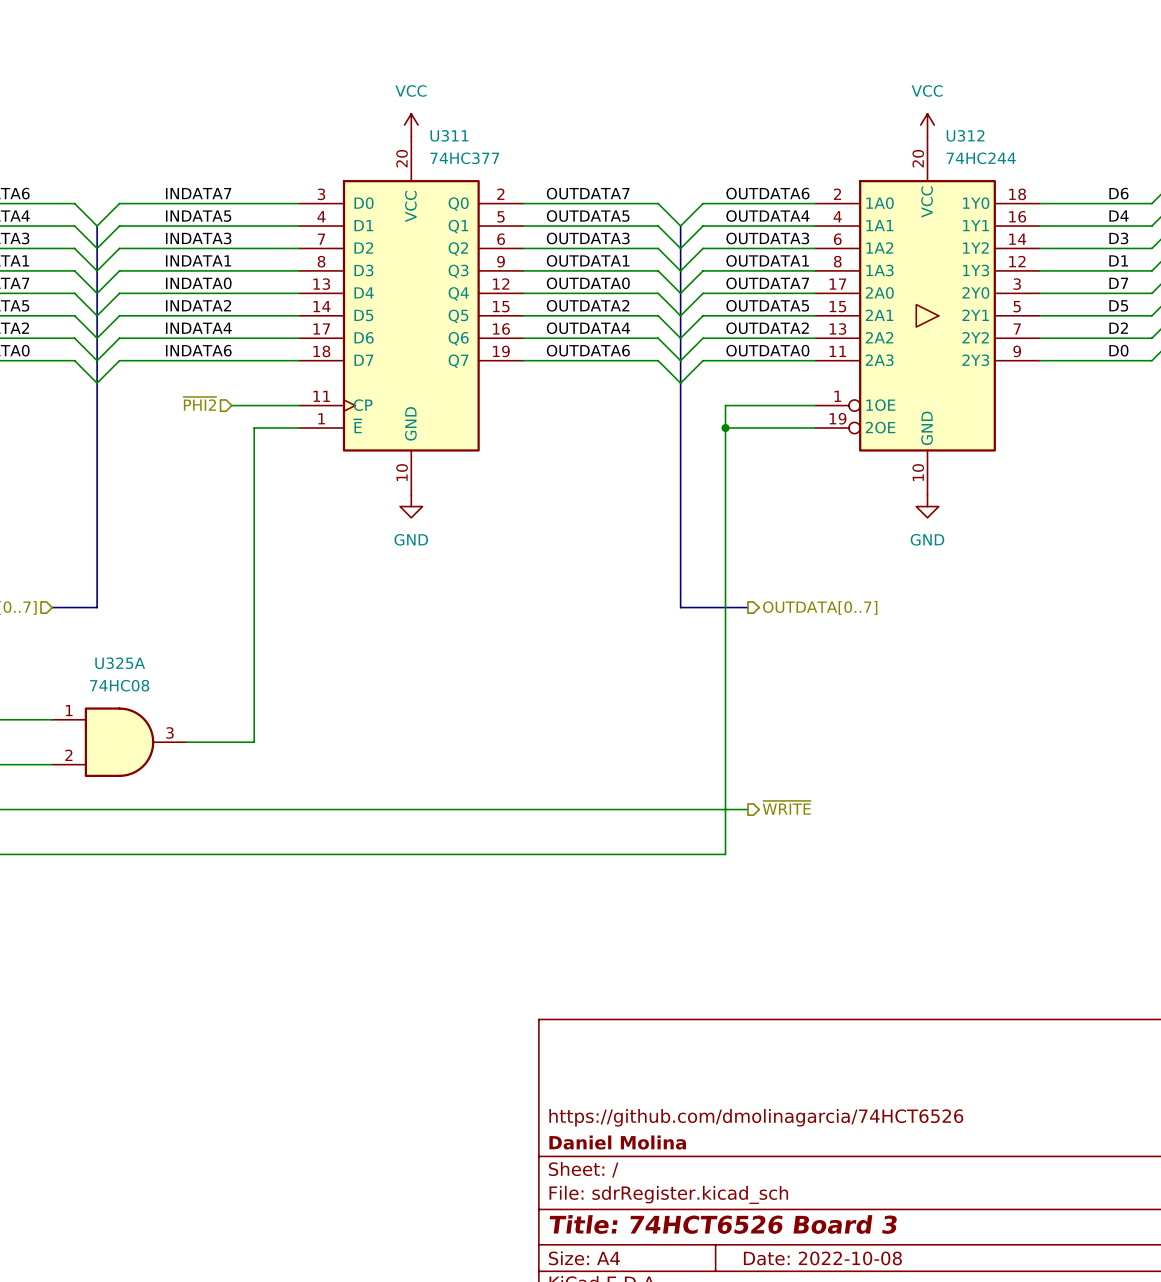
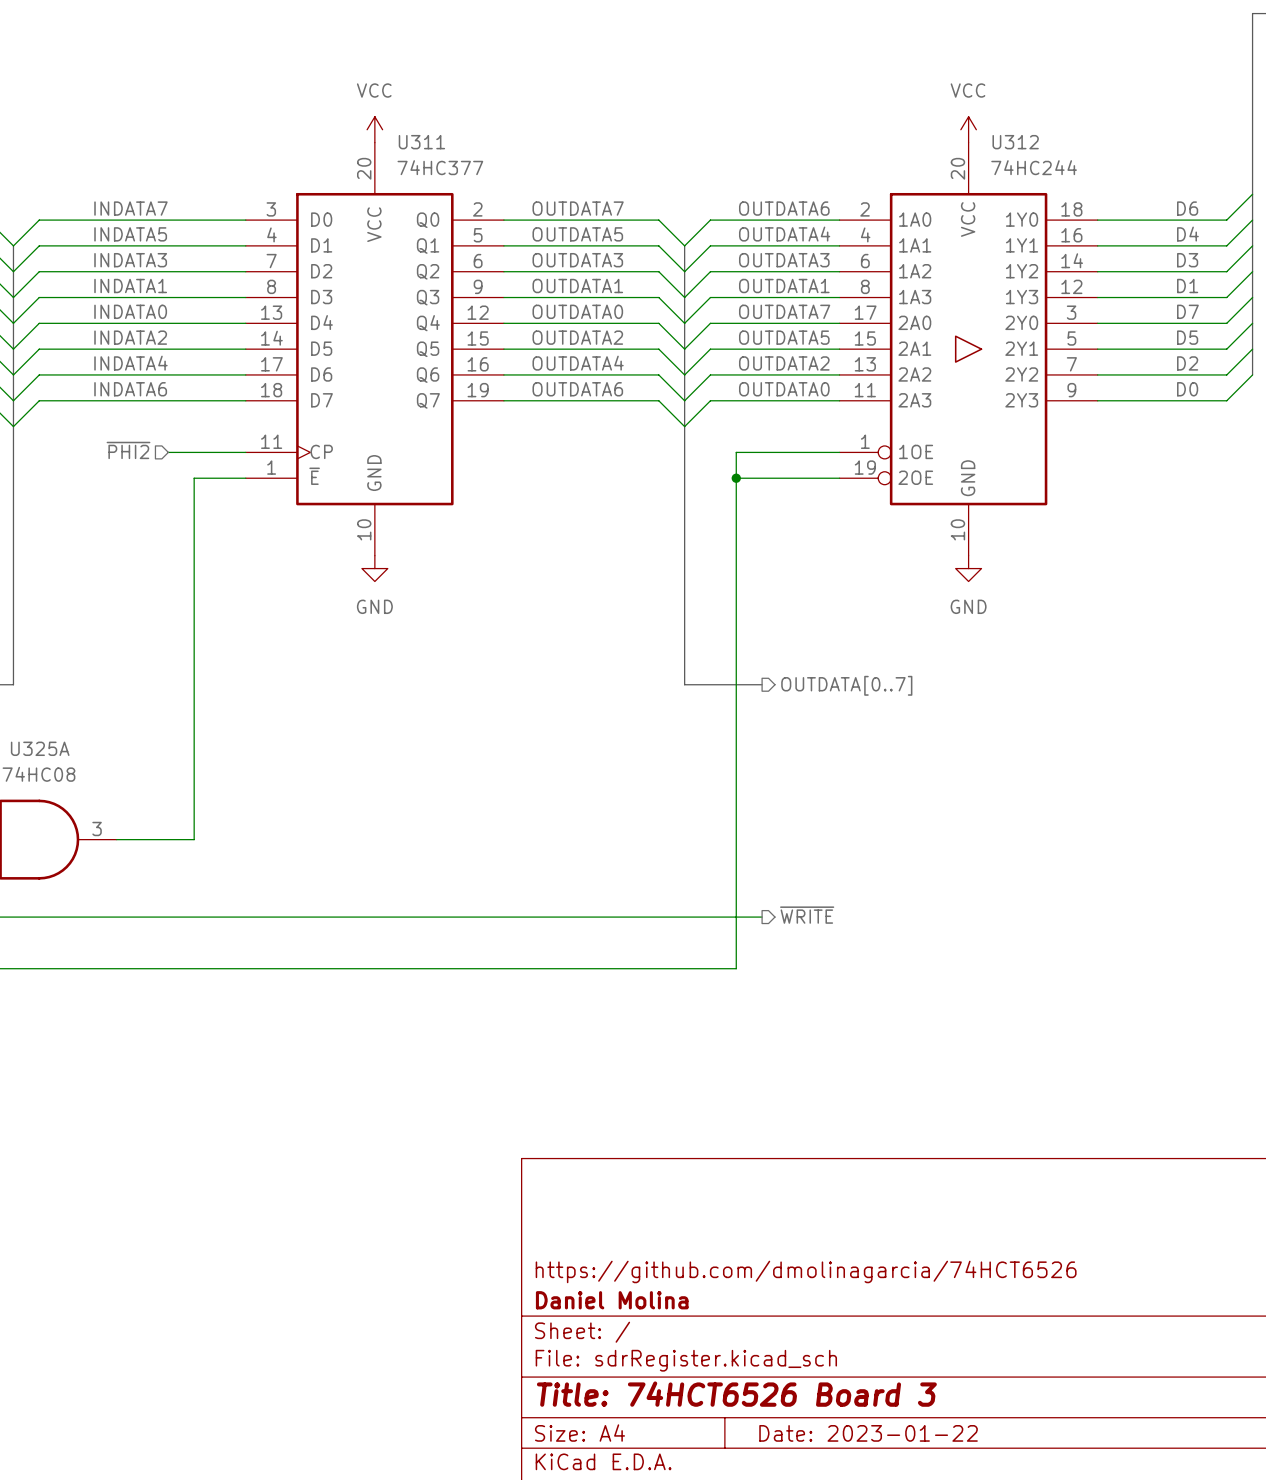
title block: Date: 2022-10-08 (822, 1258) -> Date: 2023-01-22 (868, 1433)

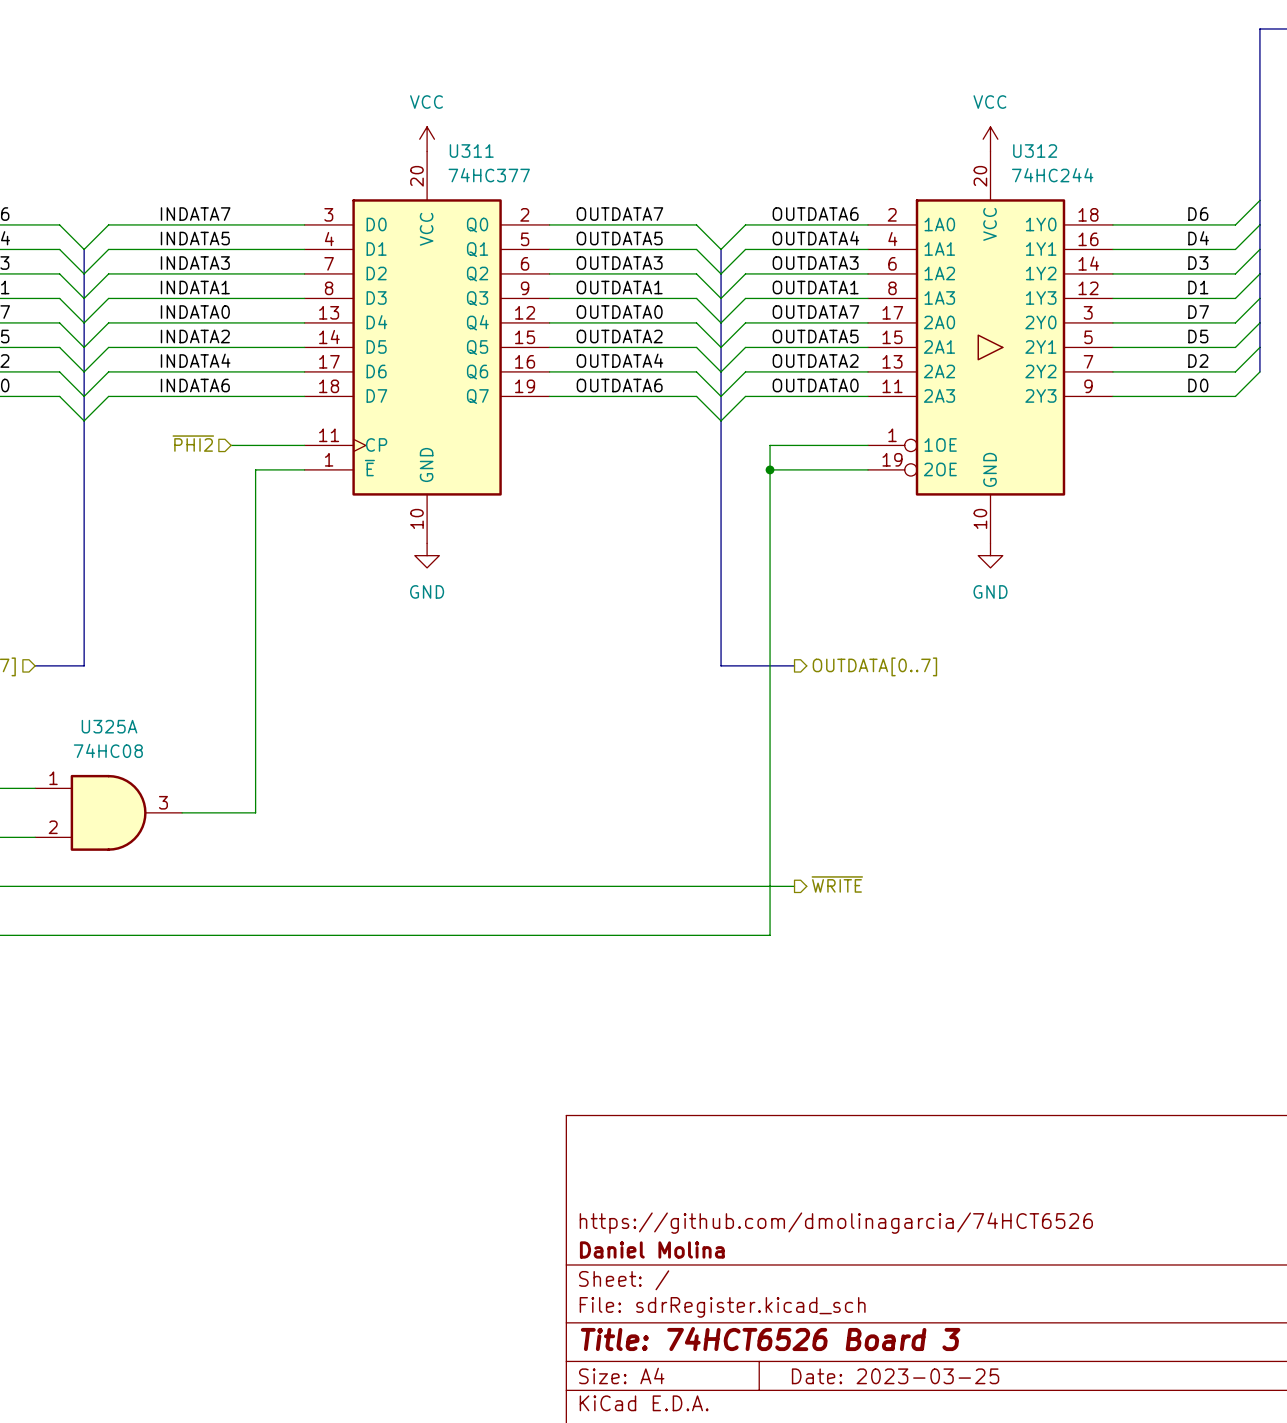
title block: Date: 2023-01-22 (868, 1433) -> Date: 2023-03-25 (895, 1376)

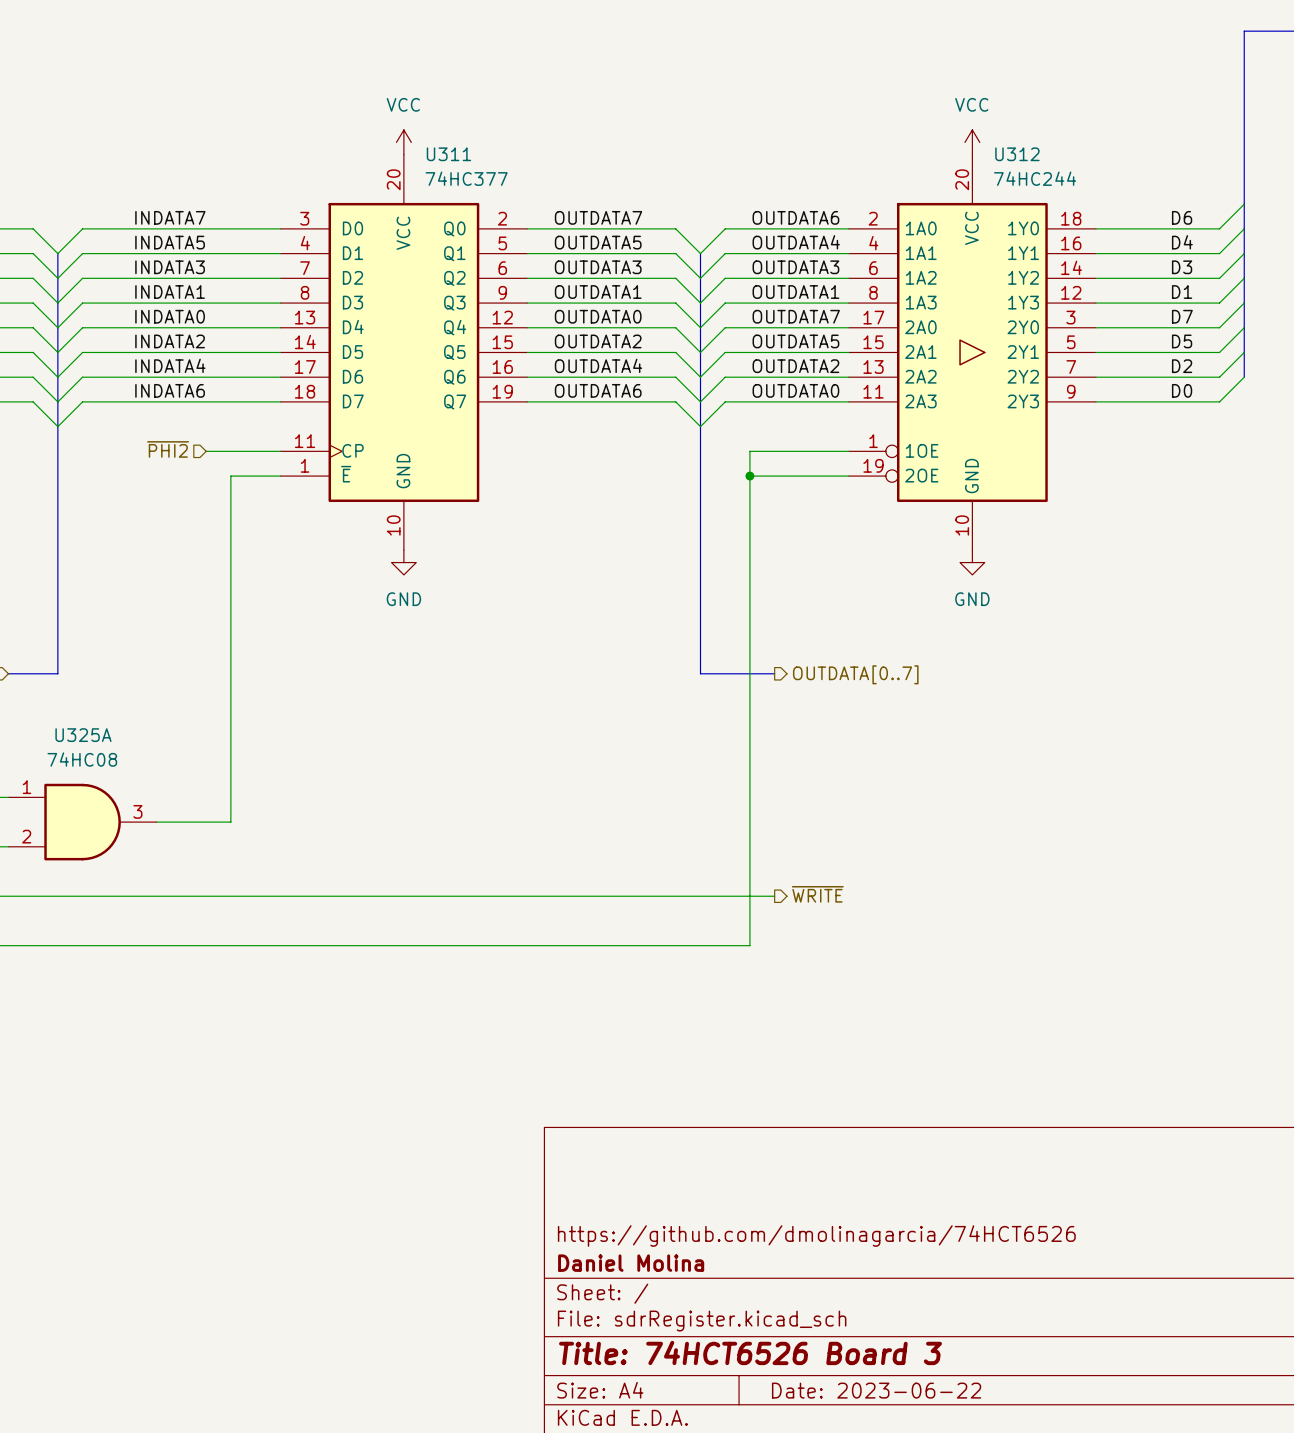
title block: Date: 2023-03-25 (895, 1376) -> Date: 2023-06-22 (876, 1390)

